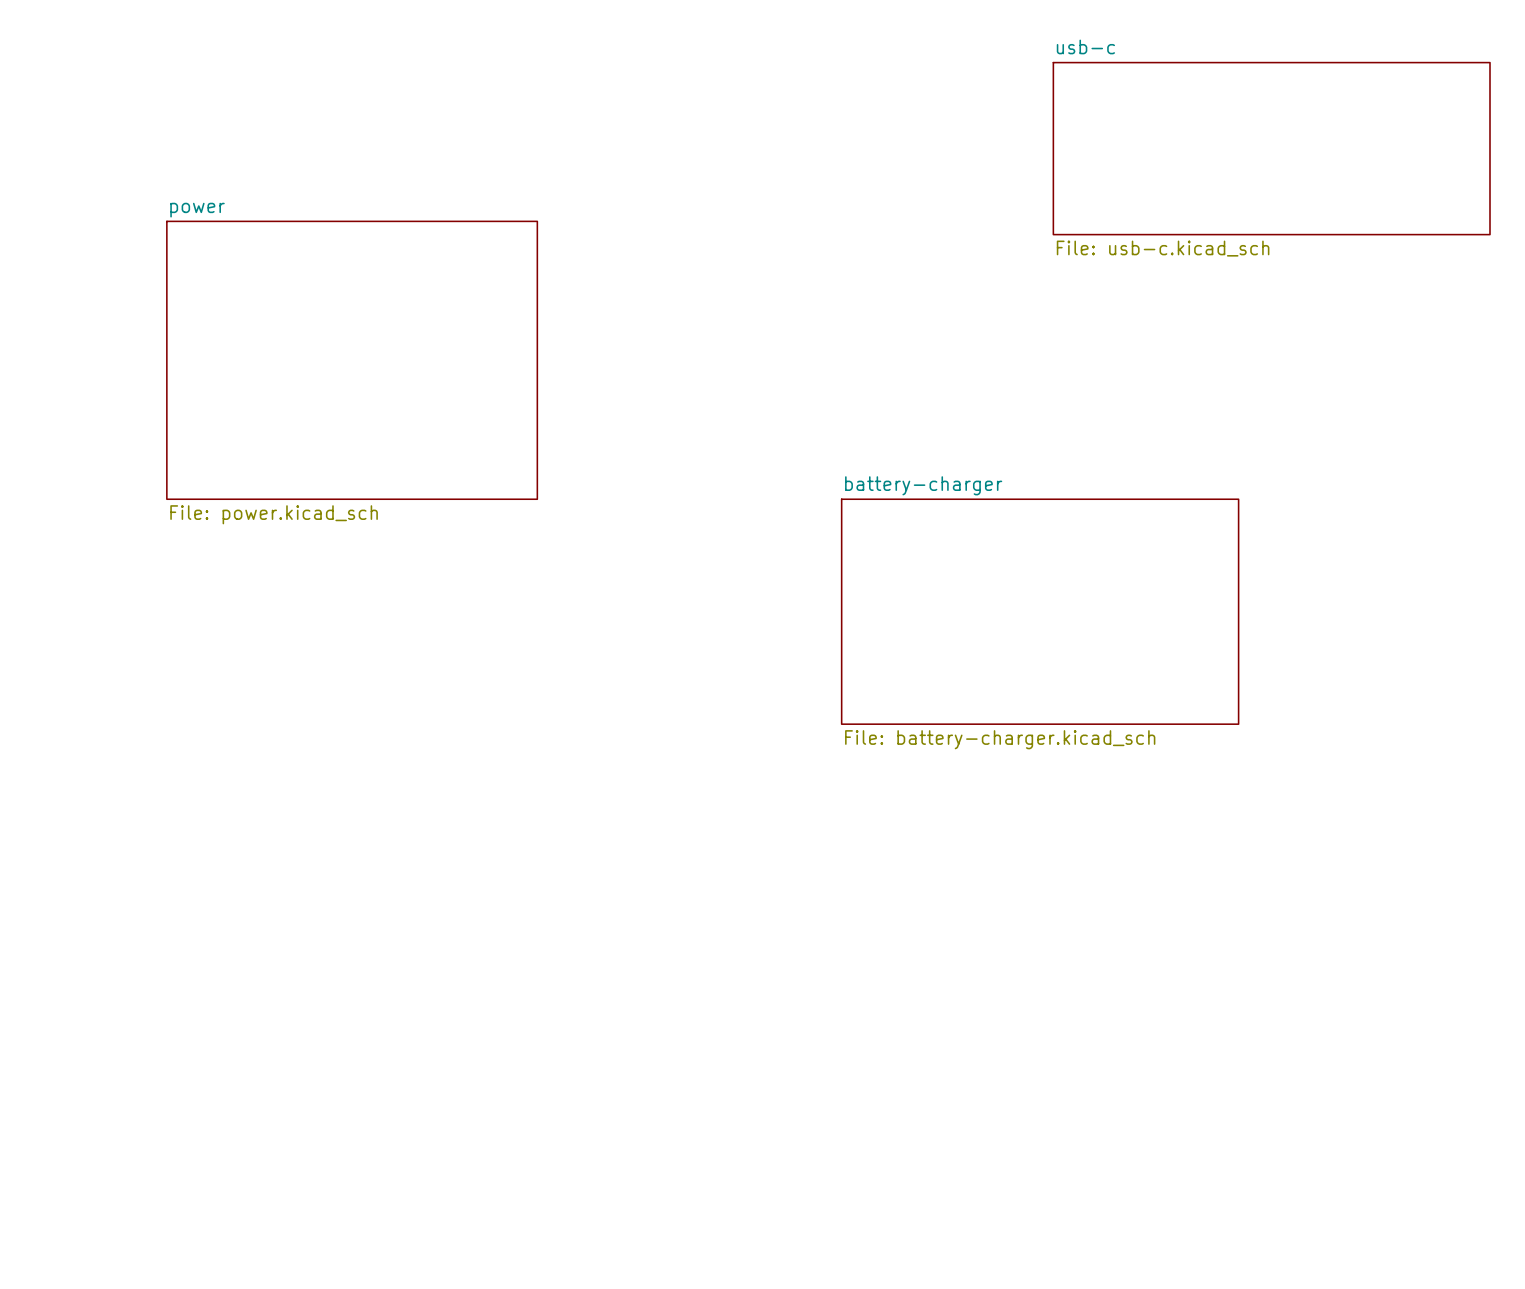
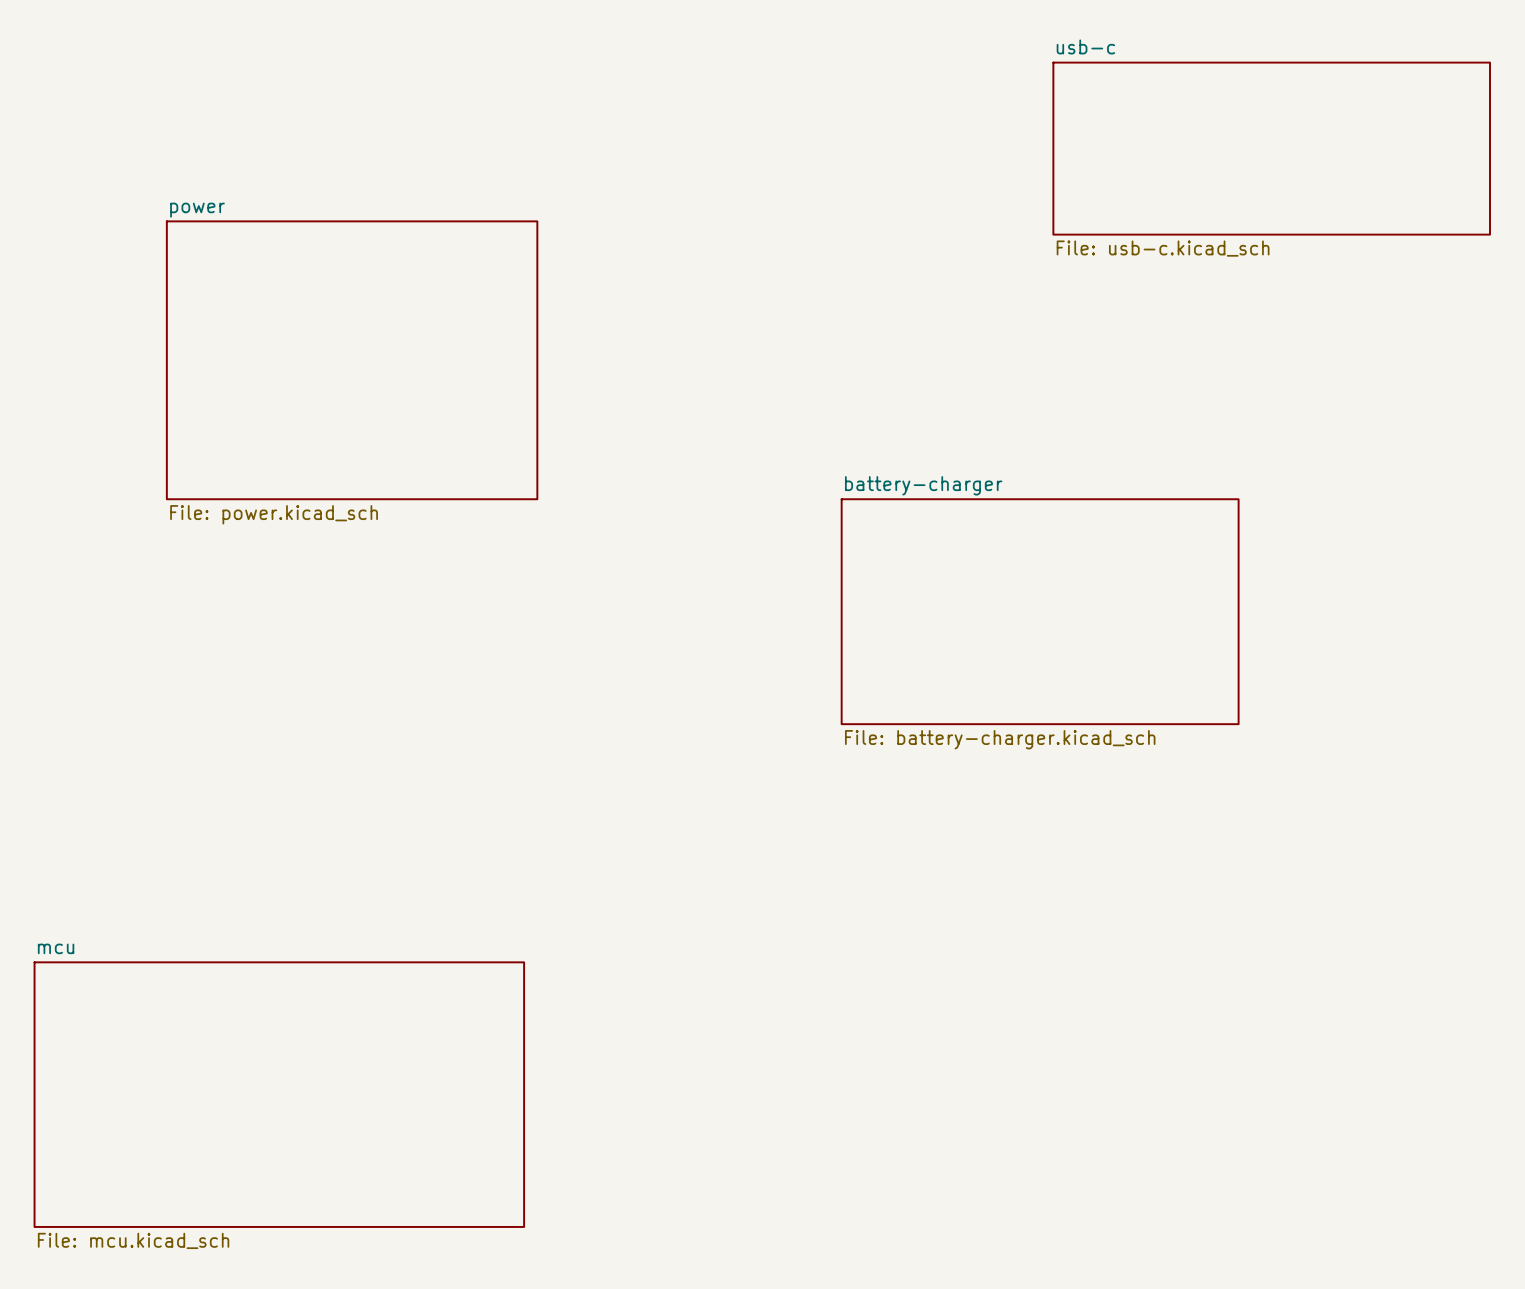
sheet mcu: none -> File: mcu.kicad_sch (279, 1094)

